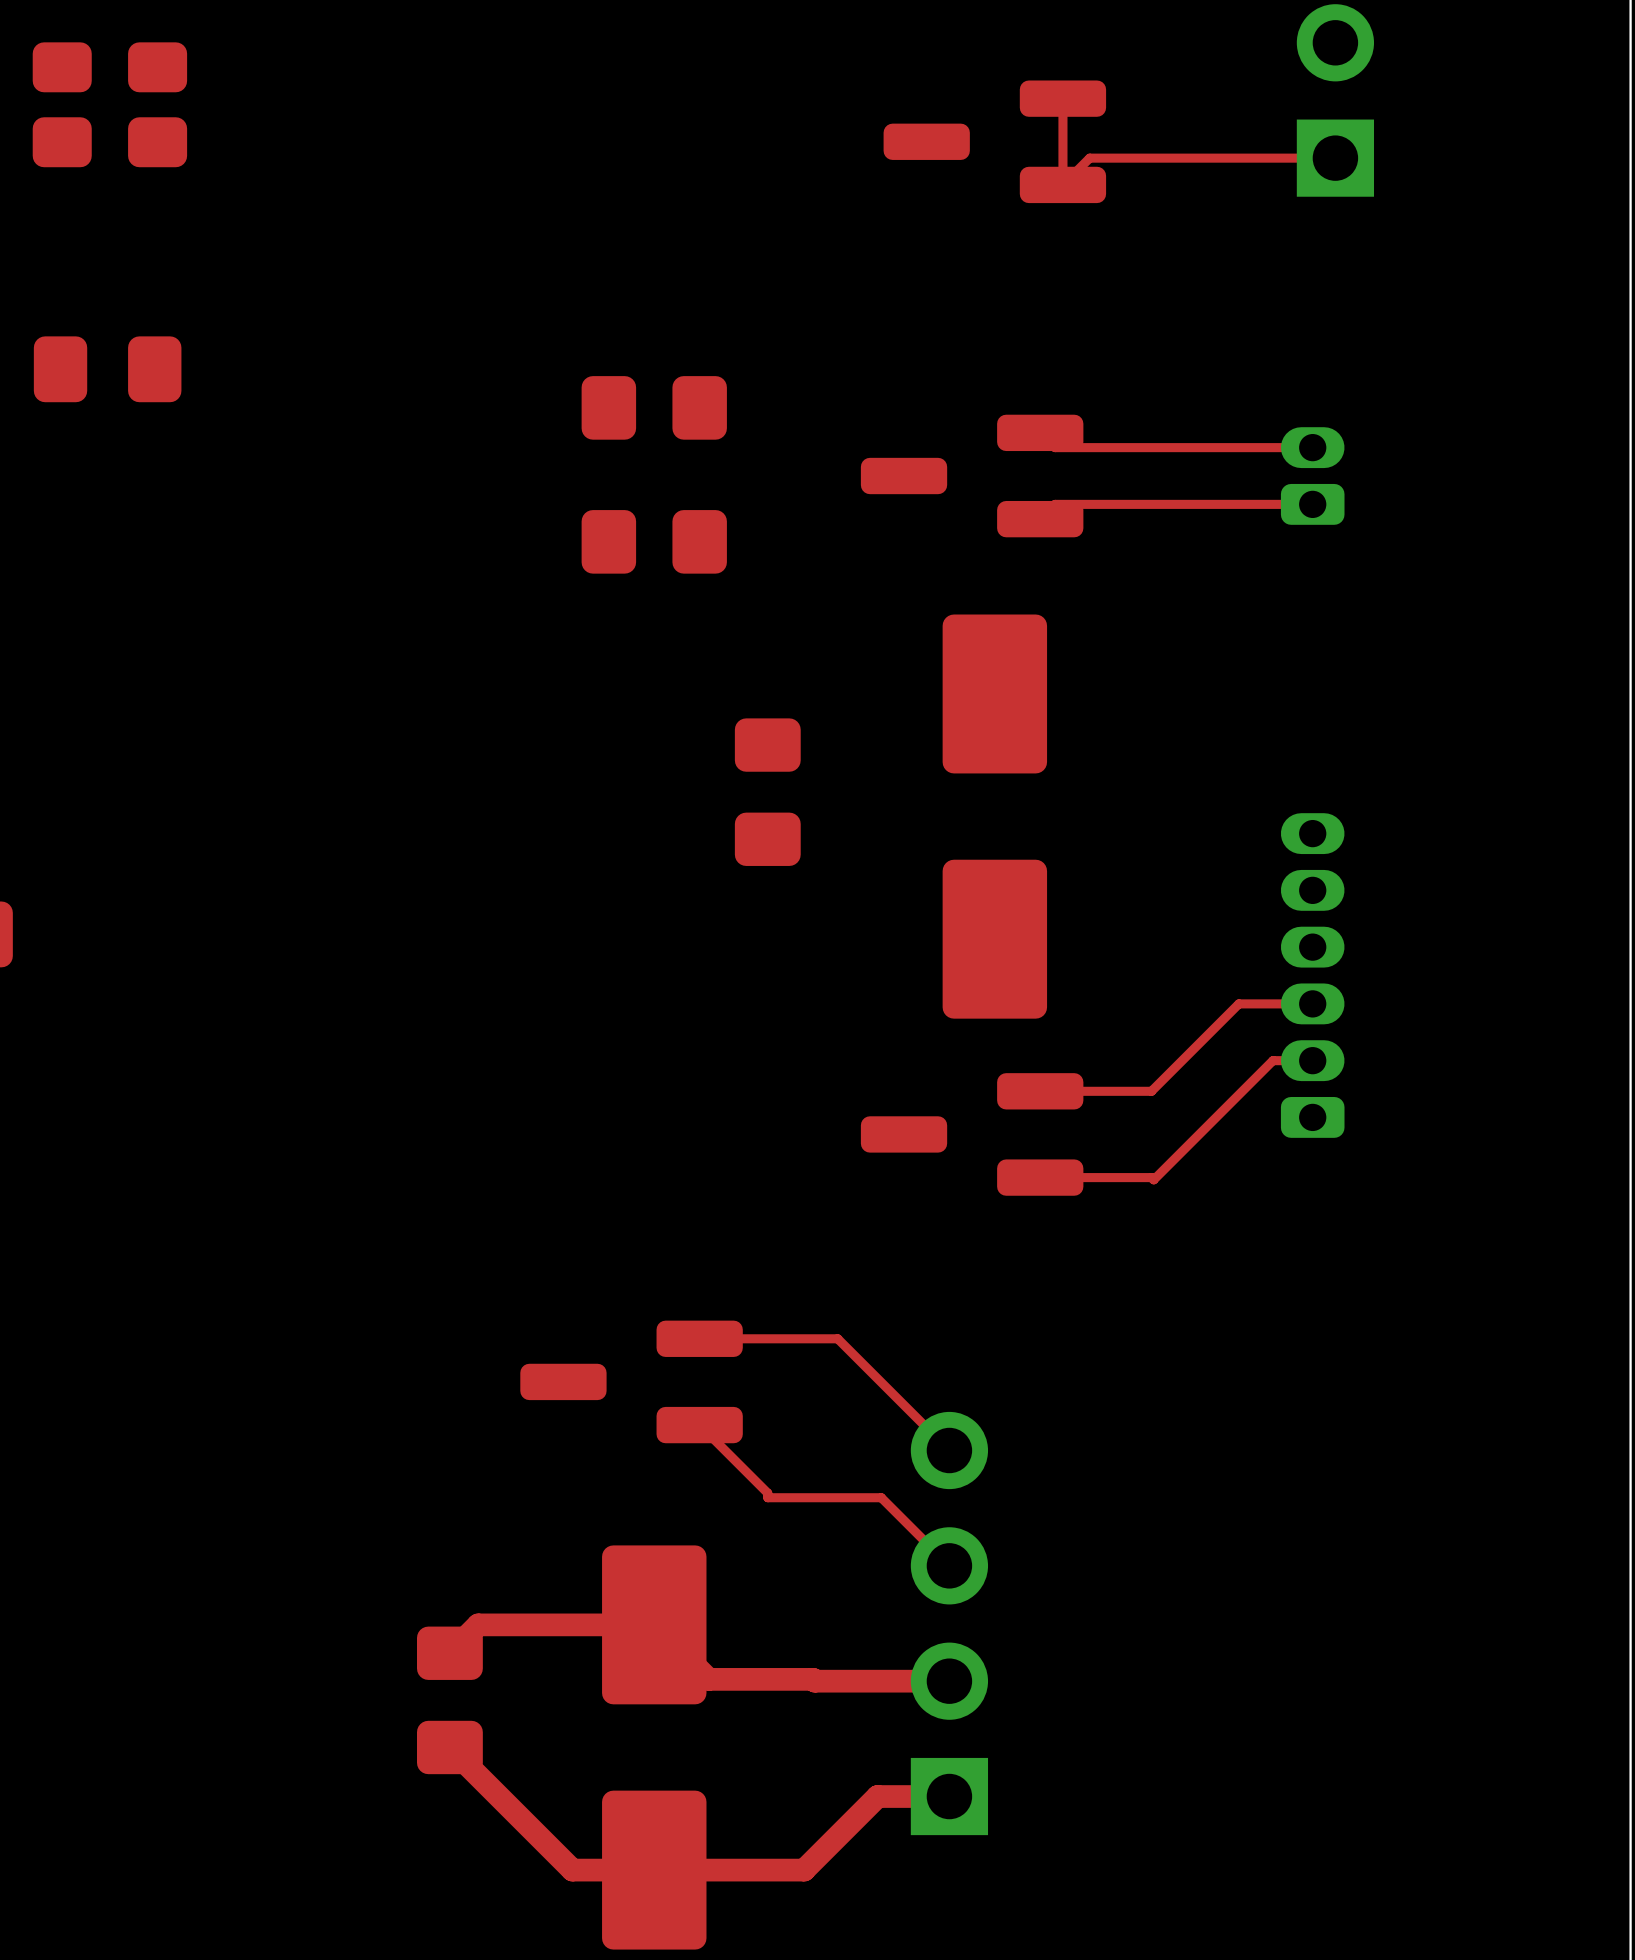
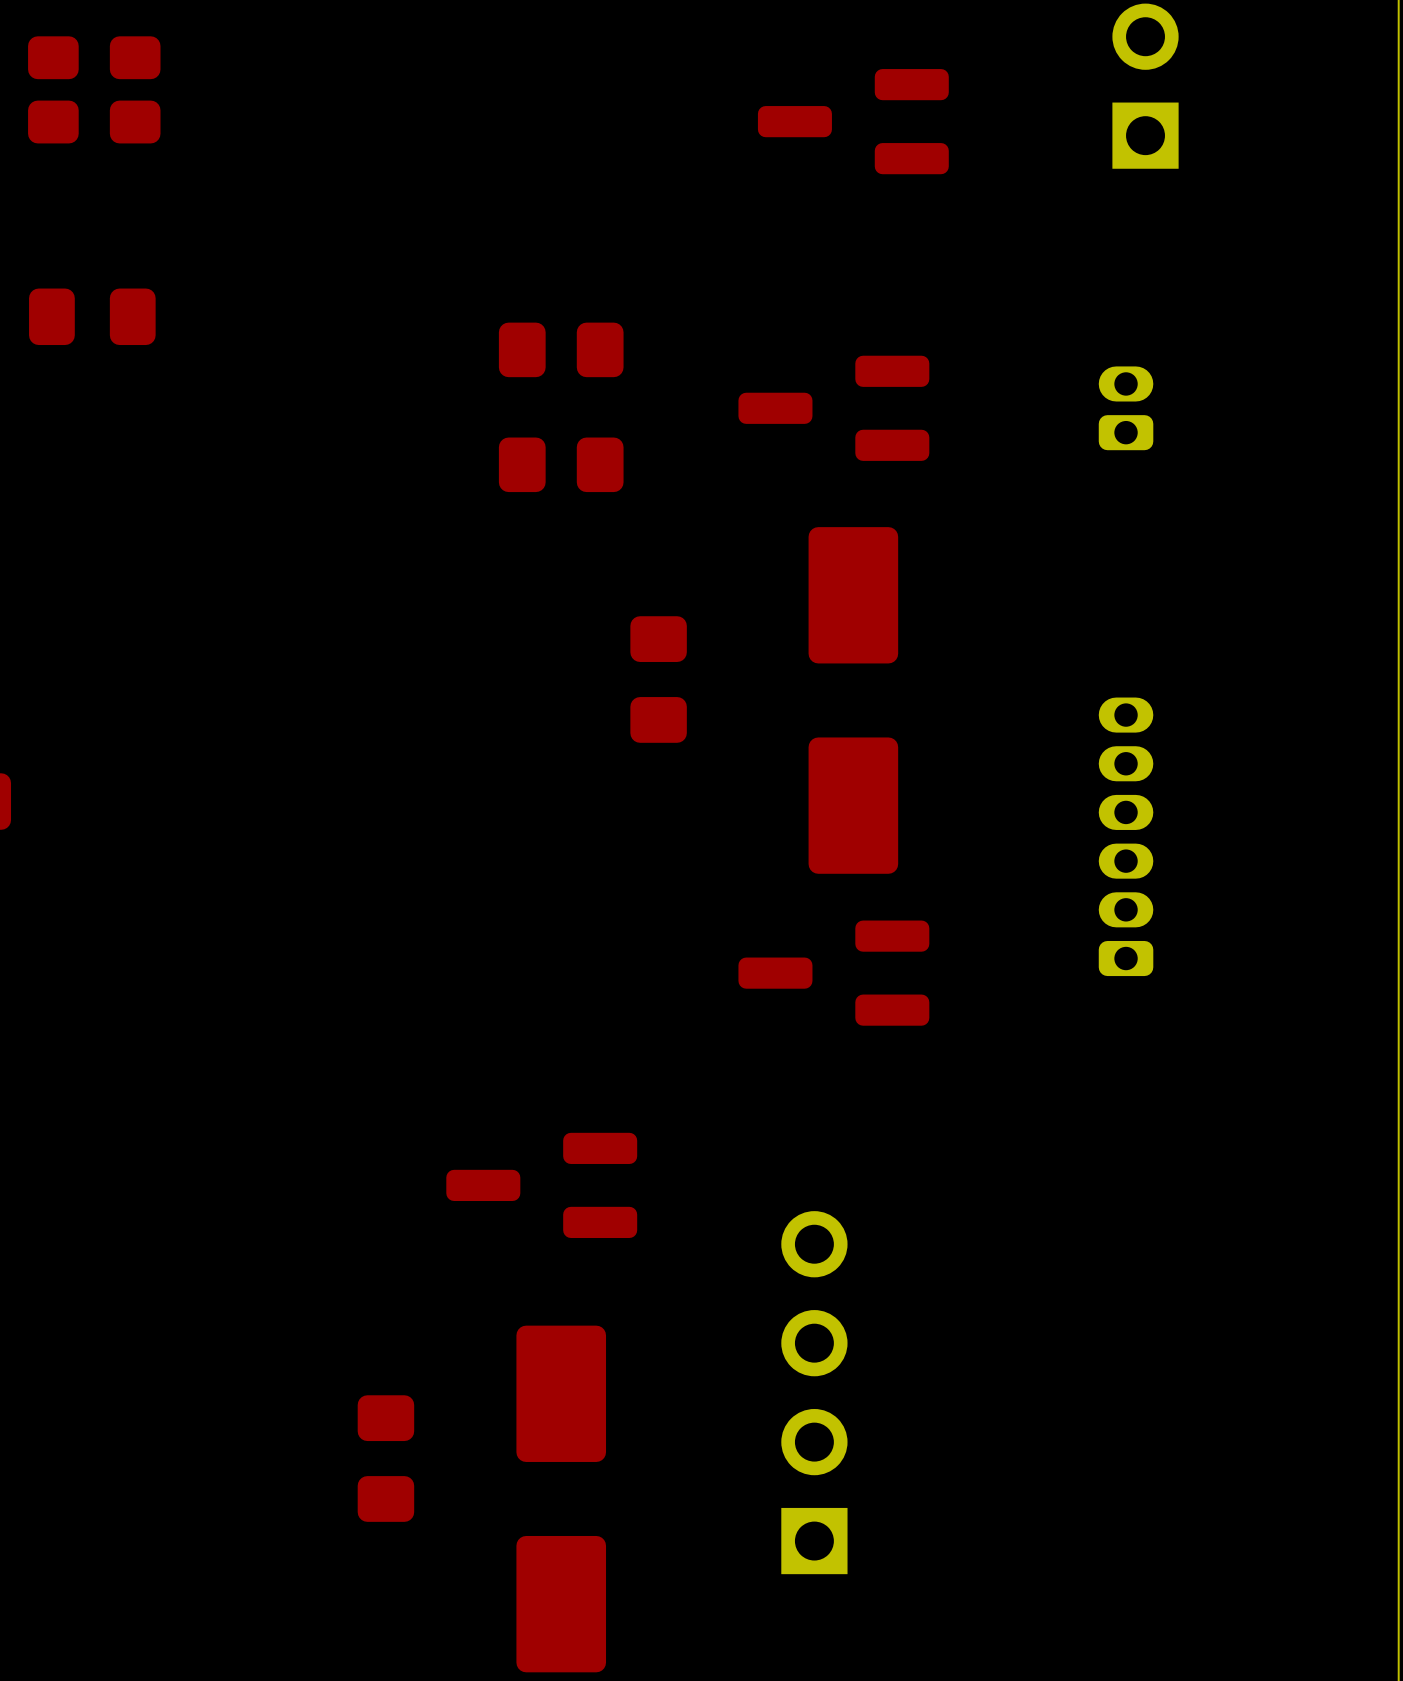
top track: (1062, 98) (1062, 184) (1089, 158) (1335, 158) -> none
top track: (1040, 432) (1055, 447) (1312, 447) -> none
top track: (1312, 504) (1055, 504) (1040, 519) -> none
top track: (1312, 1003) (1238, 1003) (1151, 1091) (1040, 1091) -> none
top track: (1312, 1060) (1272, 1060) (1153, 1179) (1151, 1177) (1040, 1177) -> none
top track: (699, 1338) (837, 1338) (949, 1450) -> none
top track: (699, 1425) (767, 1493) (767, 1497) (881, 1497) (949, 1565) -> none
top track: (449, 1653) (478, 1624) (654, 1624) (708, 1679) (949, 1681) -> none
top track: (449, 1747) (572, 1870) (804, 1870) (877, 1796) (949, 1796) -> none

